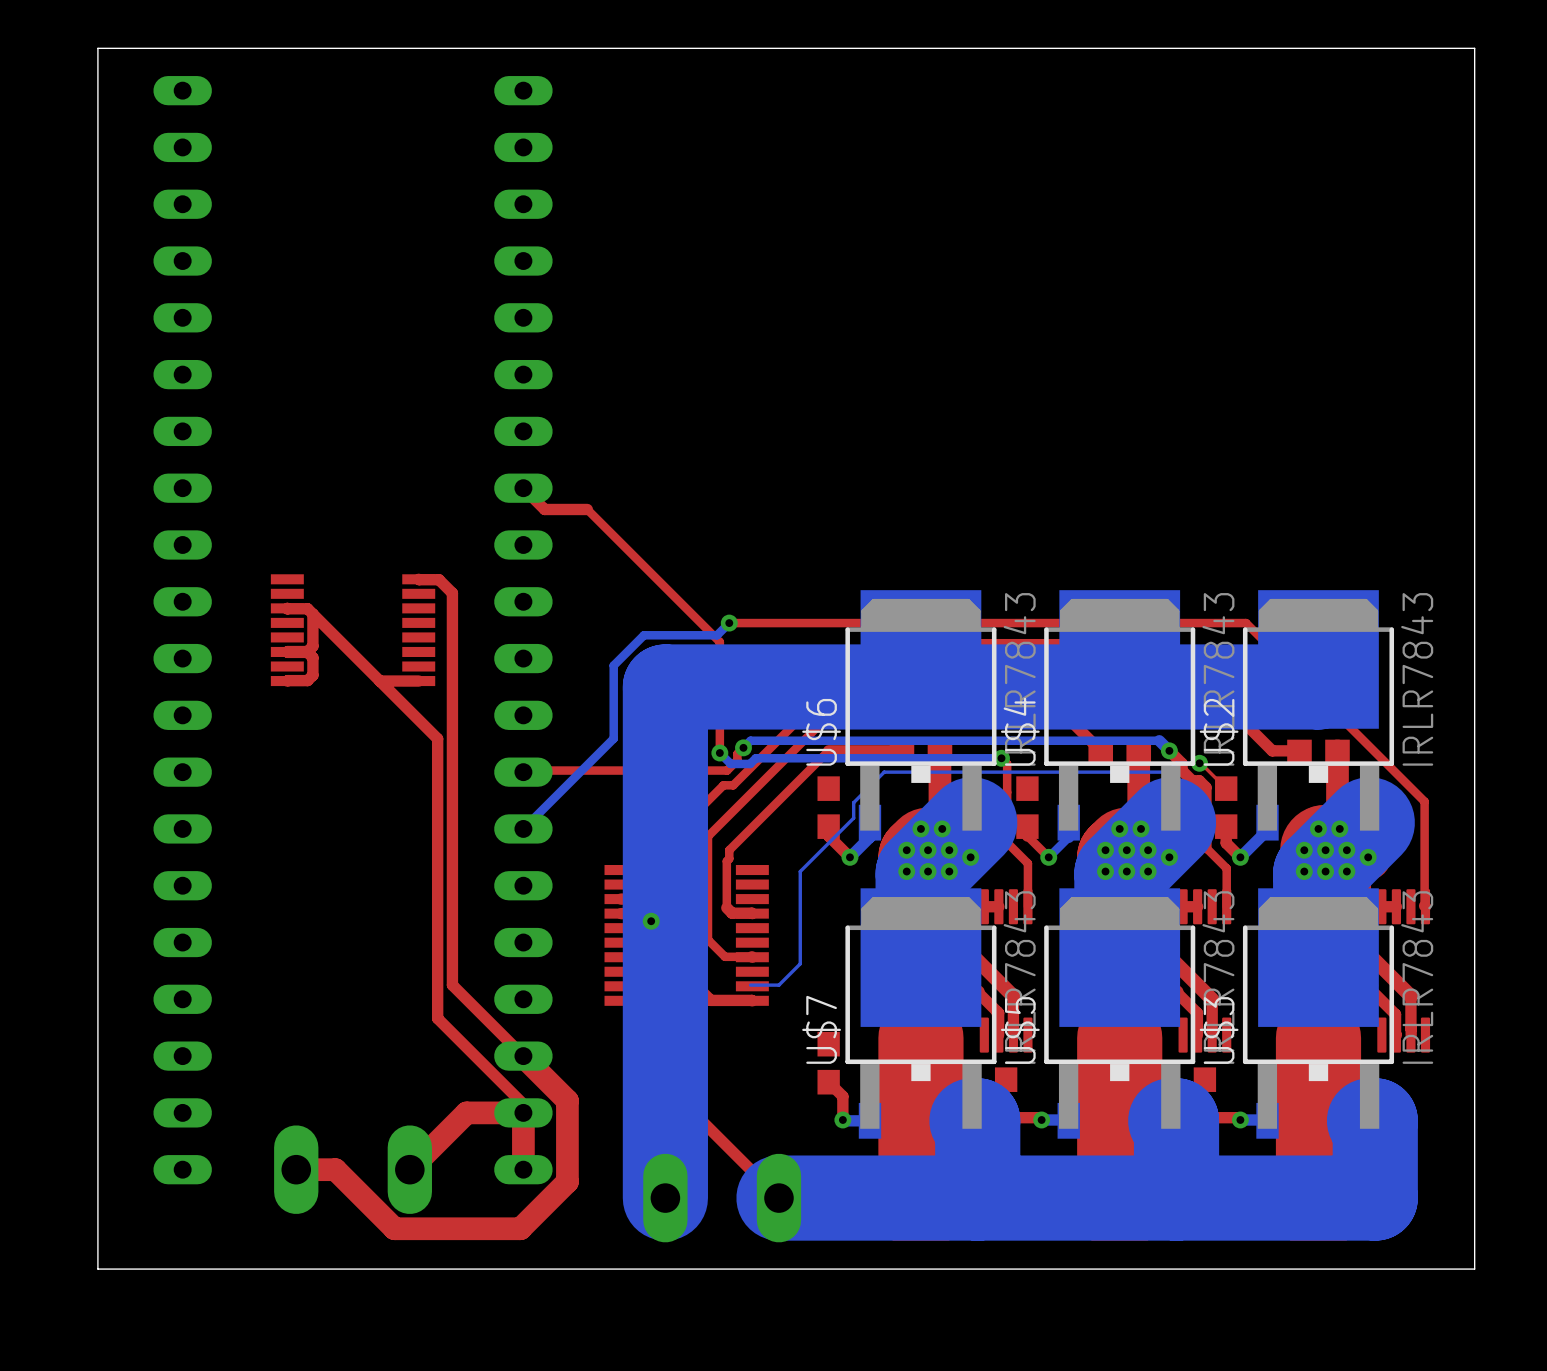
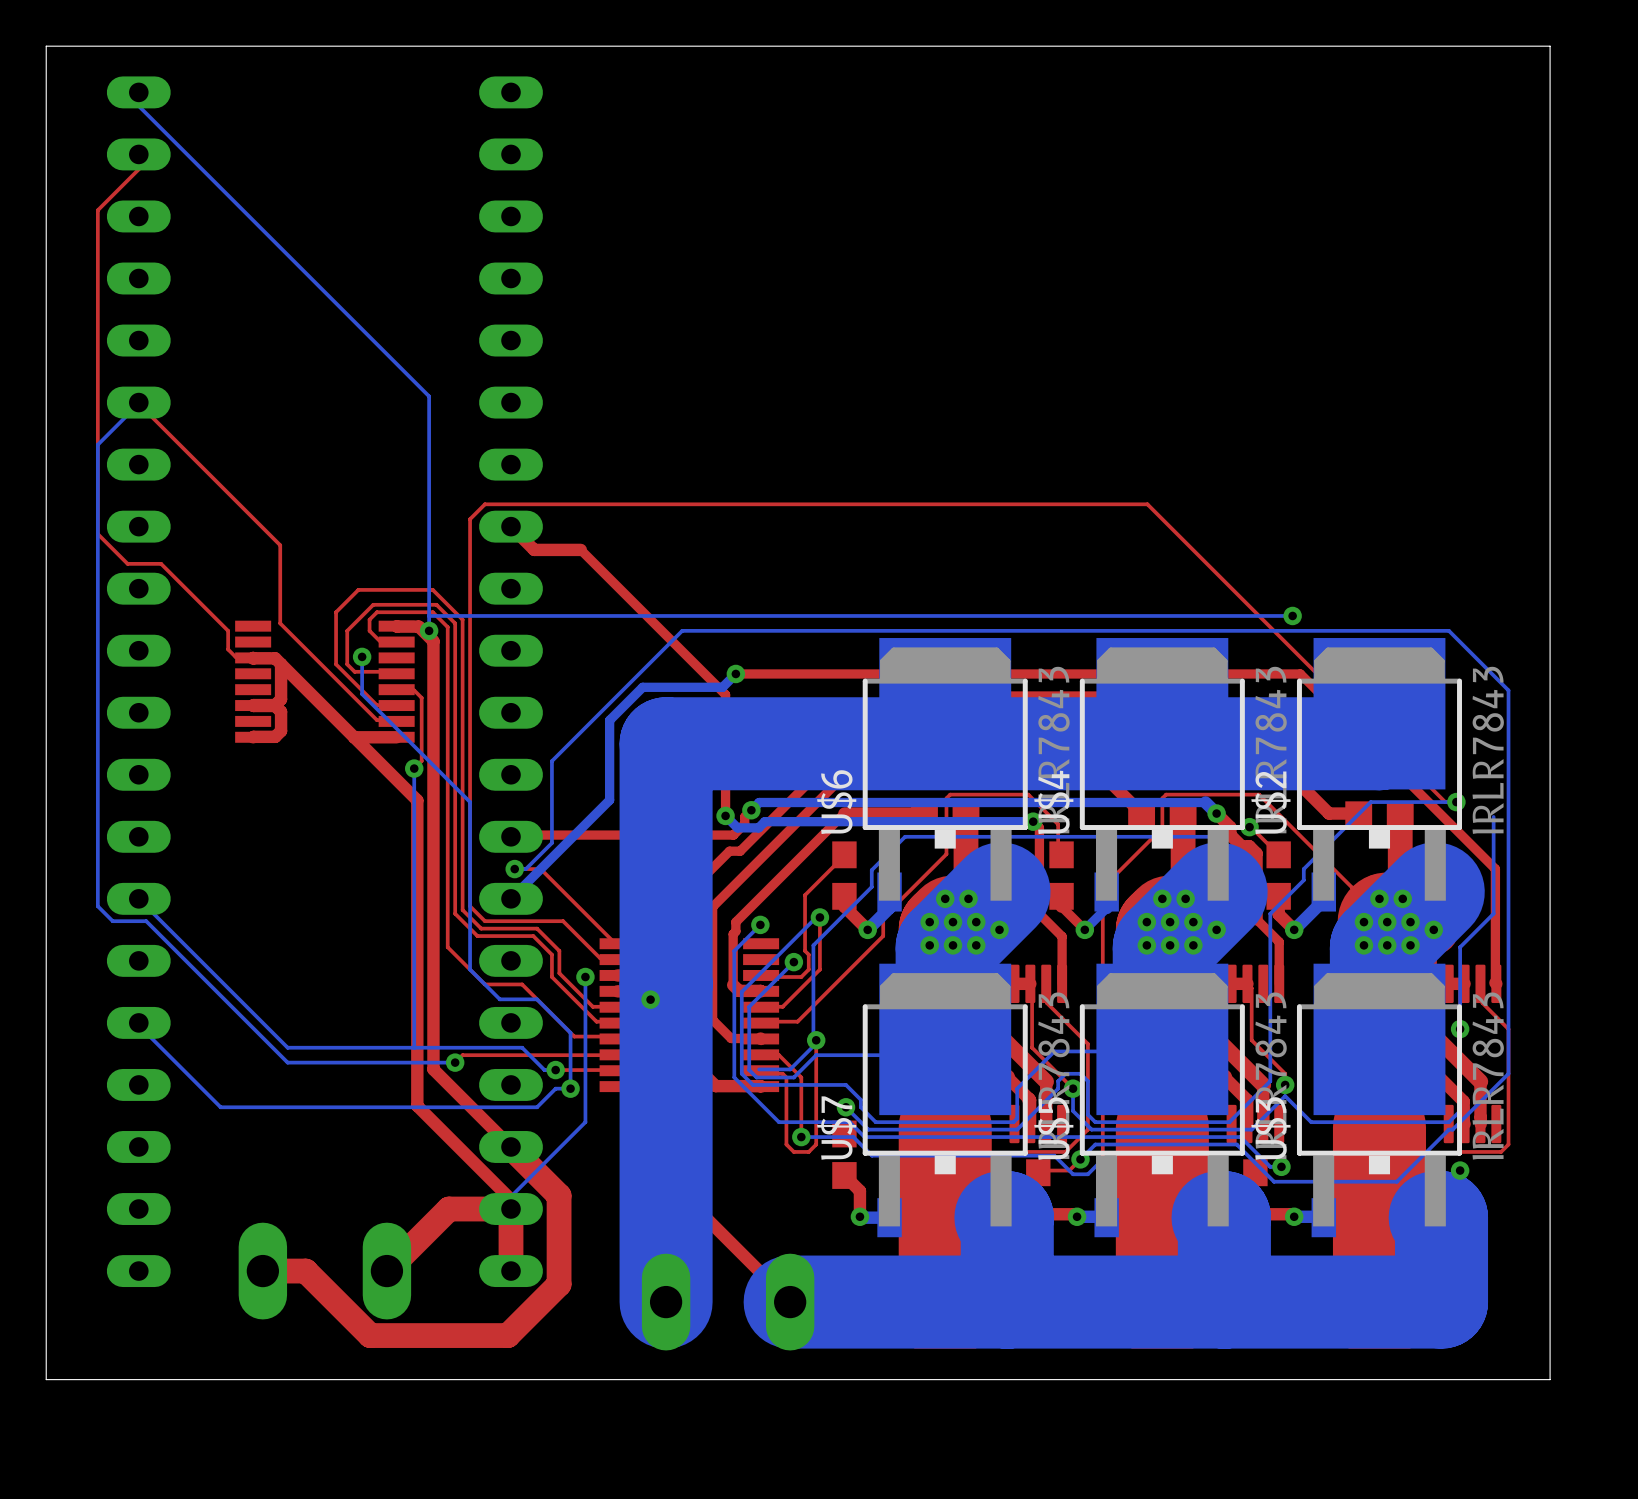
bottom track: none -> (138, 92) (138, 106) (429, 396) (429, 630)
top track: none -> (138, 154) (138, 169) (97, 210) (97, 534) (127, 563) (161, 563) (228, 630) (228, 649) (235, 656) (253, 657)
bottom track: none -> (138, 402) (97, 444) (97, 906) (112, 921) (146, 921) (287, 1062) (455, 1062)
top track: none -> (138, 402) (280, 545) (280, 623) (377, 720) (396, 721)
bottom track: none -> (1292, 615) (429, 615)
via: none -> (1292, 615)
via: none -> (429, 630)
top track: none -> (396, 642) (380, 642) (369, 630) (369, 619) (377, 612) (432, 612) (447, 627) (447, 947) (484, 984) (522, 984) (574, 1036) (615, 1036) (617, 1038)
bottom track: none -> (362, 656) (362, 694) (470, 802) (470, 969) (499, 999) (537, 999) (570, 1032) (570, 1088) (555, 1088) (537, 1107) (220, 1107) (138, 1025) (138, 1022)
via: none -> (362, 656)
top track: none -> (396, 673) (395, 671) (354, 671) (347, 664) (347, 630) (373, 604) (436, 604) (455, 623) (455, 913) (477, 936) (533, 936) (551, 954) (551, 977) (596, 1021) (617, 1023)
top track: none -> (396, 689) (414, 690) (421, 697) (421, 761) (414, 768)
top track: none -> (396, 705) (377, 705) (336, 664) (336, 612) (358, 589) (432, 589) (462, 619) (462, 910) (481, 928) (537, 928) (559, 950) (559, 973) (592, 1006) (617, 1007)
bottom track: none -> (414, 768) (414, 1047)
via: none -> (414, 768)
bottom track: none -> (1456, 802) (1370, 802) (1303, 869) (1303, 880) (1270, 913) (1270, 1081) (1229, 1122) (1095, 1122) (1087, 1114) (1087, 1081) (1080, 1073) (1065, 1073) (1058, 1081) (1058, 1088) (1017, 1129) (868, 1129) (845, 1107)
top track: none -> (1456, 802) (1445, 802) (1147, 504) (484, 504) (470, 519) (470, 906) (484, 921) (563, 921) (600, 958) (617, 959)
via: none -> (1456, 802)
bottom track: none -> (1493, 816) (1493, 913) (1460, 947) (1460, 1111) (1448, 1122) (1311, 1122) (1285, 1096) (1251, 1129) (1091, 1129) (1073, 1111) (1073, 1088)
top track: none -> (844, 854) (805, 895) (805, 950) (808, 954) (808, 969) (801, 977) (761, 975)
top track: none -> (1061, 854) (1058, 854) (1058, 824) (1028, 794) (950, 794) (946, 798) (946, 854) (883, 917) (883, 936) (797, 1021) (761, 1023)
bottom track: none -> (514, 869) (525, 869) (551, 843) (551, 761) (682, 630) (1448, 630) (1508, 690) (1508, 1073) (1396, 1181) (1274, 1181) (1236, 1144) (1095, 1144) (1080, 1159)
top track: none -> (514, 869) (540, 869) (615, 943) (617, 943)
via: none -> (514, 869)
bottom track: none -> (138, 898) (287, 1047) (522, 1047) (544, 1070) (555, 1070)
bottom track: none -> (819, 917) (816, 917) (741, 991) (741, 1073) (752, 1084) (845, 1084) (860, 1099) (860, 1107) (875, 1122) (1013, 1122) (1017, 1118) (1017, 1088) (1054, 1051) (1113, 1051) (1162, 1039)
top track: none -> (819, 917) (819, 969) (782, 1006) (761, 1007)
via: none -> (819, 917)
top track: none -> (1387, 922) (1259, 794) (1166, 794) (1162, 798) (1162, 828) (1102, 887) (1102, 1159)
bottom track: none -> (760, 924) (734, 950) (734, 1077) (778, 1122) (849, 1122) (864, 1137) (1240, 1137) (1270, 1166) (1281, 1166)
via: none -> (760, 924)
bottom track: none -> (793, 962) (749, 1006) (749, 1070) (756, 1077) (793, 1077) (816, 1055) (898, 1055) (945, 1039)
via: none -> (793, 962)
bottom track: none -> (585, 977) (585, 1122) (511, 1196) (511, 1209)
via: none -> (585, 977)
top track: none -> (1030, 983) (1032, 988) (1032, 1047) (1073, 1088)
top track: none -> (1046, 983) (1046, 1003) (1087, 1044) (1087, 1129) (1065, 1151) (1024, 1151)
top track: none -> (1247, 983) (1251, 988) (1251, 1040) (1285, 1073) (1285, 1084)
top track: none -> (1480, 983) (1482, 984) (1482, 1003) (1508, 1029) (1508, 1144) (1501, 1151) (1460, 1151)
via: none -> (1460, 1029)
top track: none -> (816, 1040) (816, 1144) (808, 1151) (793, 1151) (786, 1144) (786, 1077) (782, 1073) (764, 1073) (761, 1070)
via: none -> (816, 1040)
top track: none -> (617, 1054) (462, 1055) (455, 1062)
top track: none -> (761, 1054) (778, 1055) (801, 1077) (801, 1137)
via: none -> (455, 1062)
top track: none -> (555, 1070) (617, 1070)
via: none -> (555, 1070)
via: none -> (1285, 1084)
via: none -> (570, 1088)
via: none -> (1073, 1088)
via: none -> (845, 1107)
bottom track: none -> (801, 1137) (853, 1137) (872, 1155) (1054, 1155) (1073, 1174) (1087, 1174) (1102, 1159)
via: none -> (801, 1137)
top track: none -> (1080, 1159) (1069, 1170) (1039, 1170) (1038, 1172)
via: none -> (1080, 1159)
via: none -> (1281, 1166)
via: none -> (1460, 1170)

